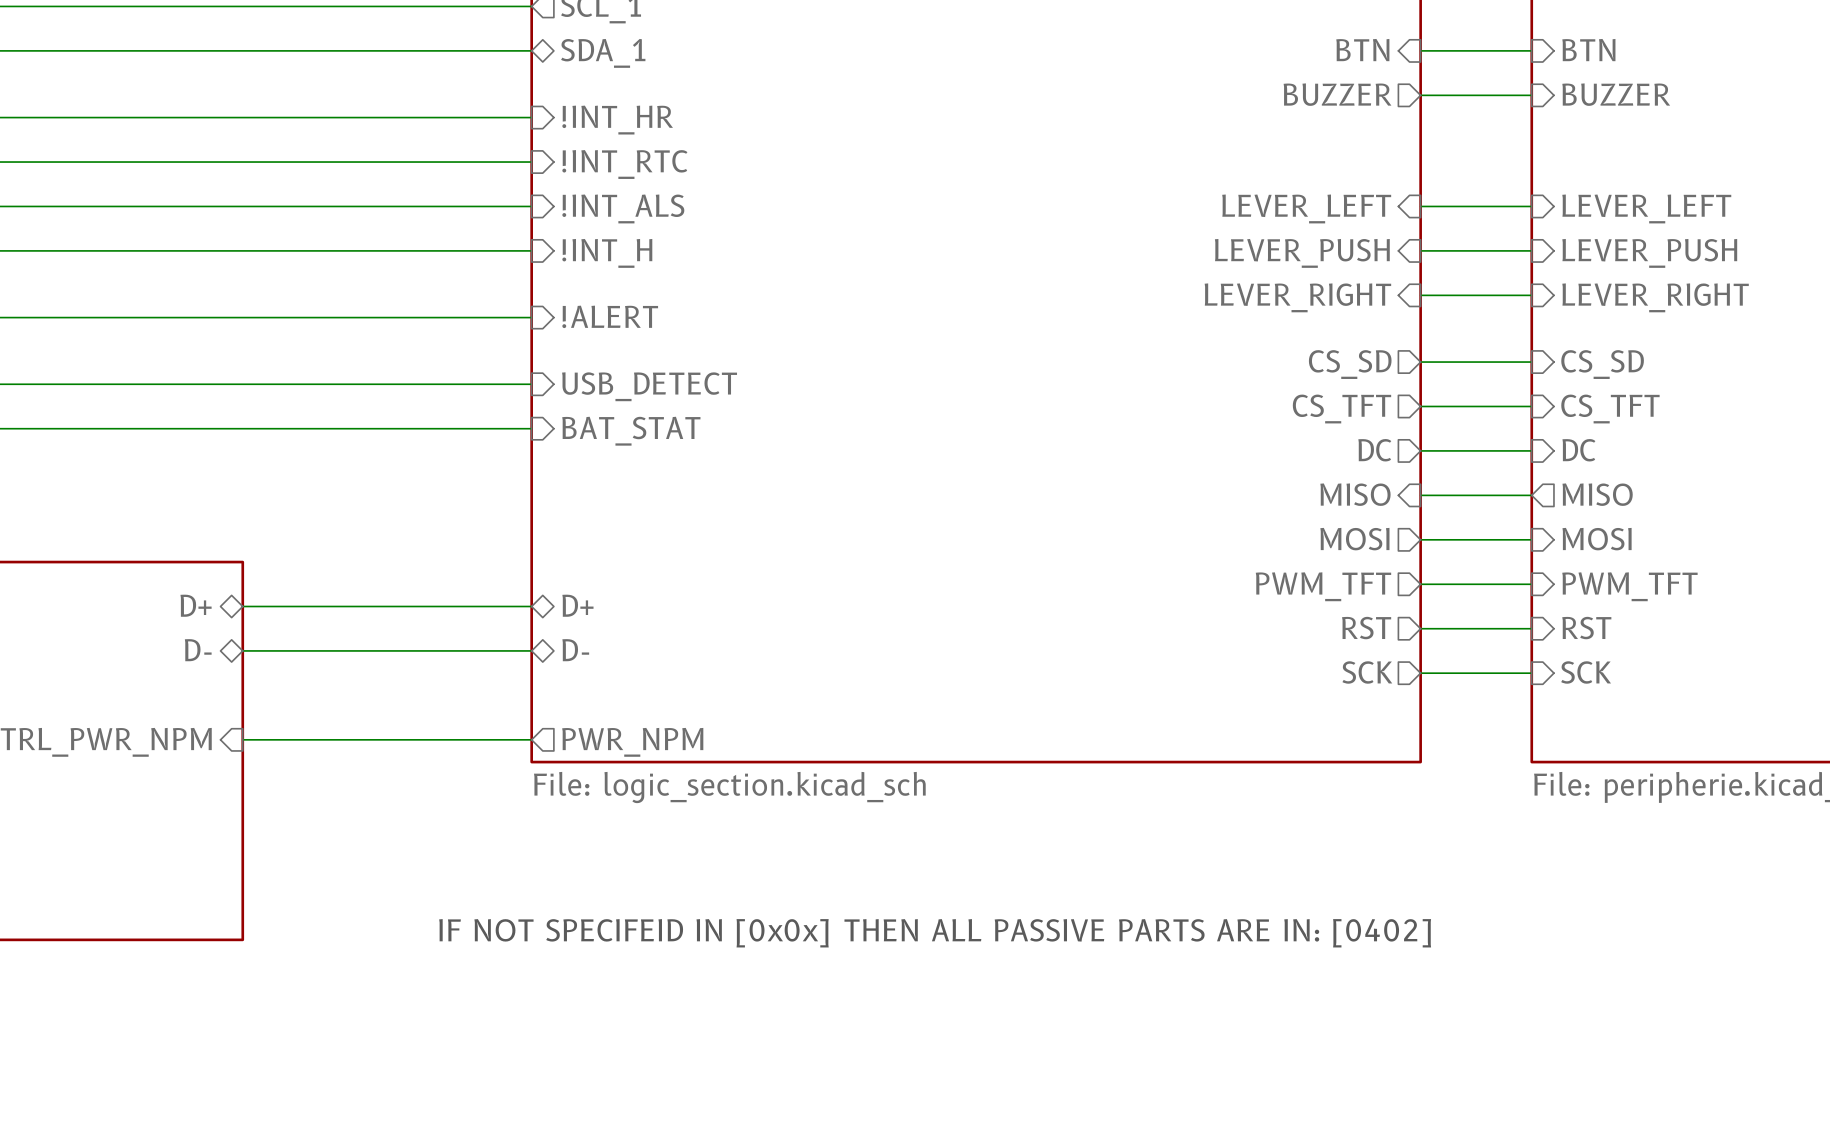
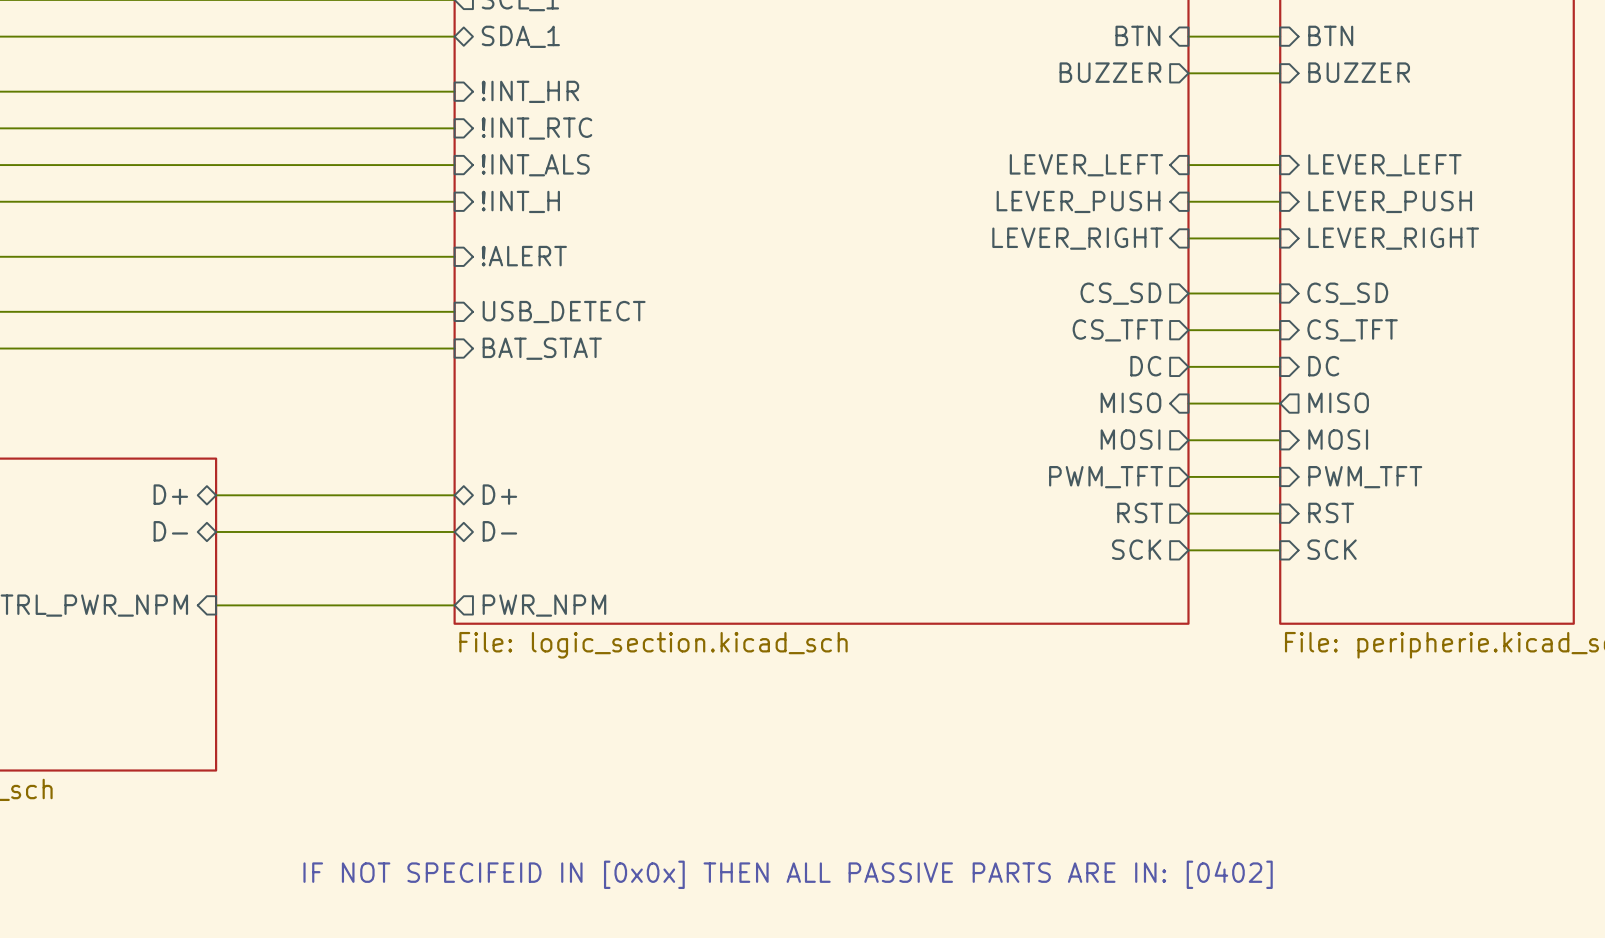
text position: IF NOT SPECIFEID IN [0x0x] THEN ALL PASSIVE PARTS ARE IN: [0402] (935, 933) -> IF NOT SPECIFEID IN [0x0x] THEN ALL PASSIVE PARTS ARE IN: [0402] (788, 874)

